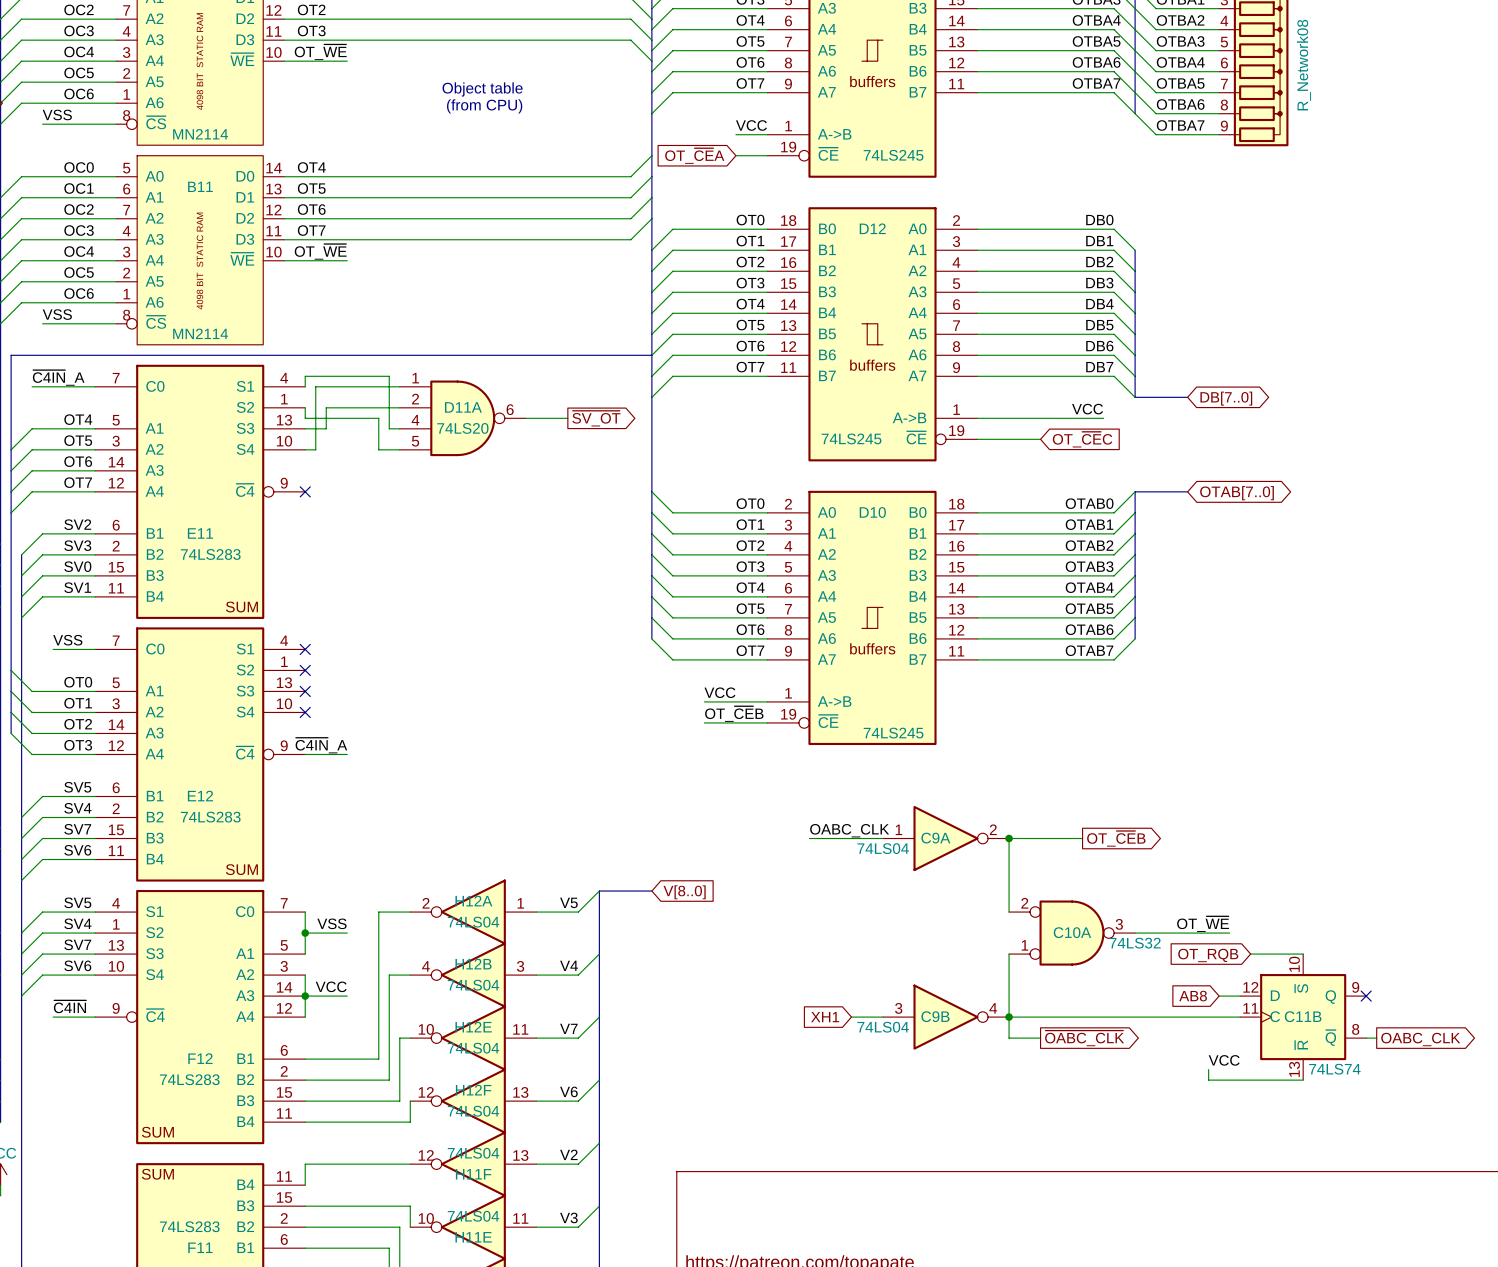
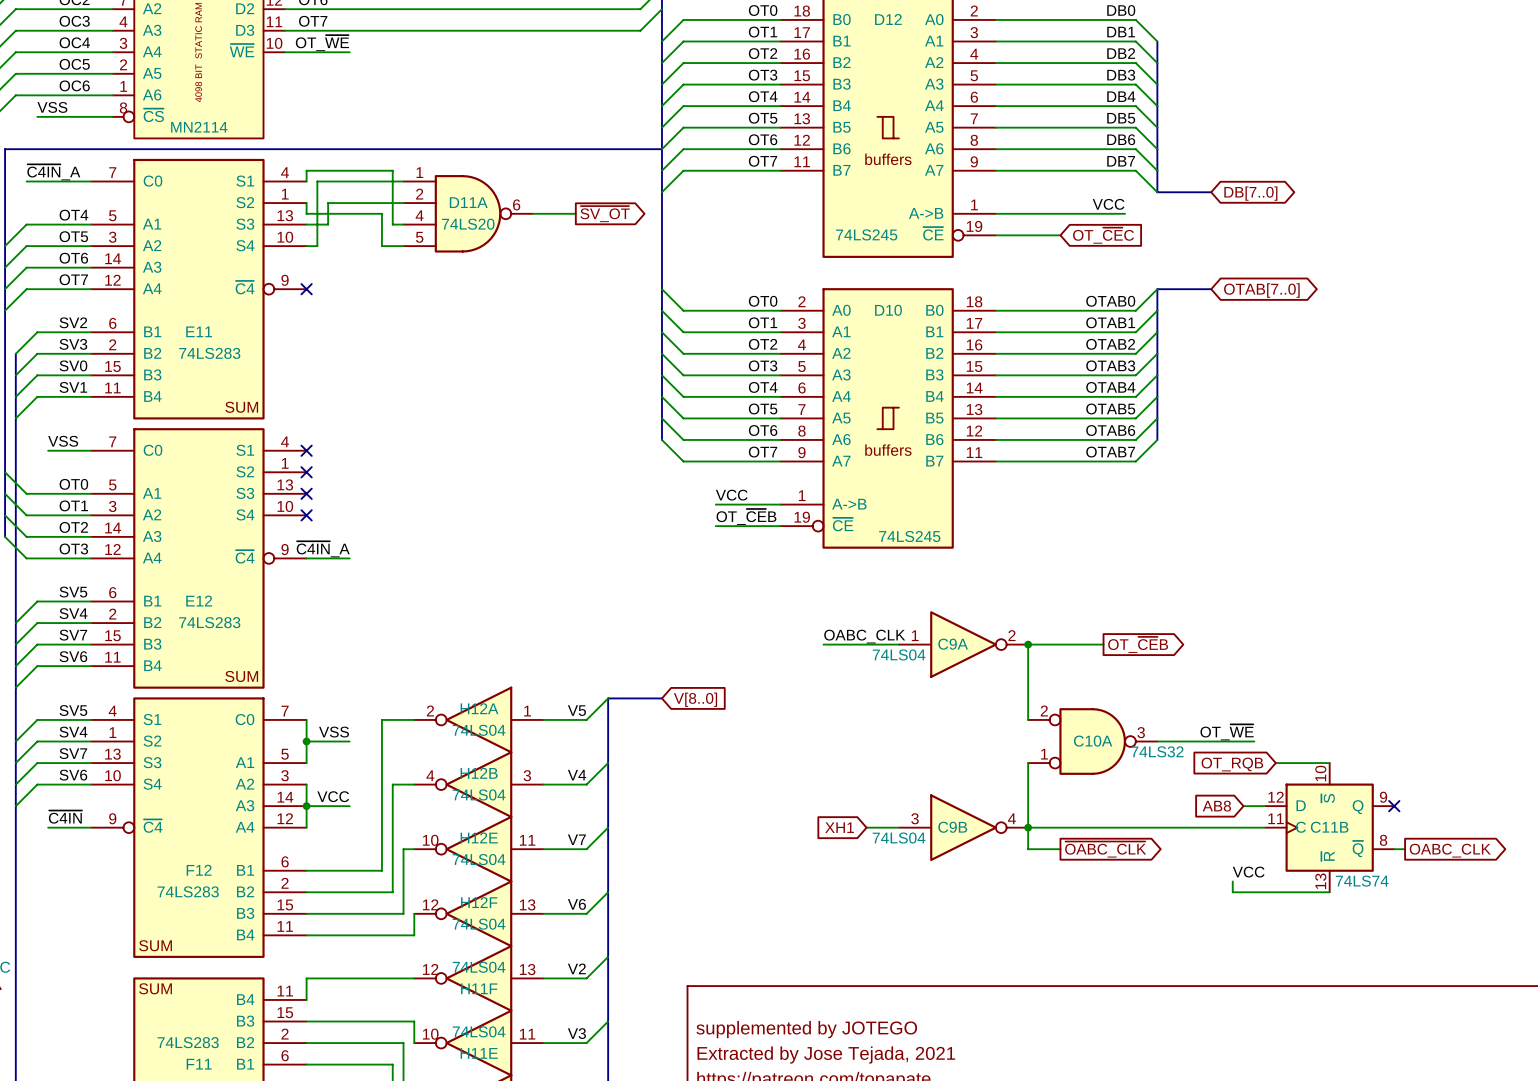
title block: none -> supplemented by JOTEGO (806, 1029)
title block: none -> Extracted by Jose Tejada, 2021 (826, 1055)

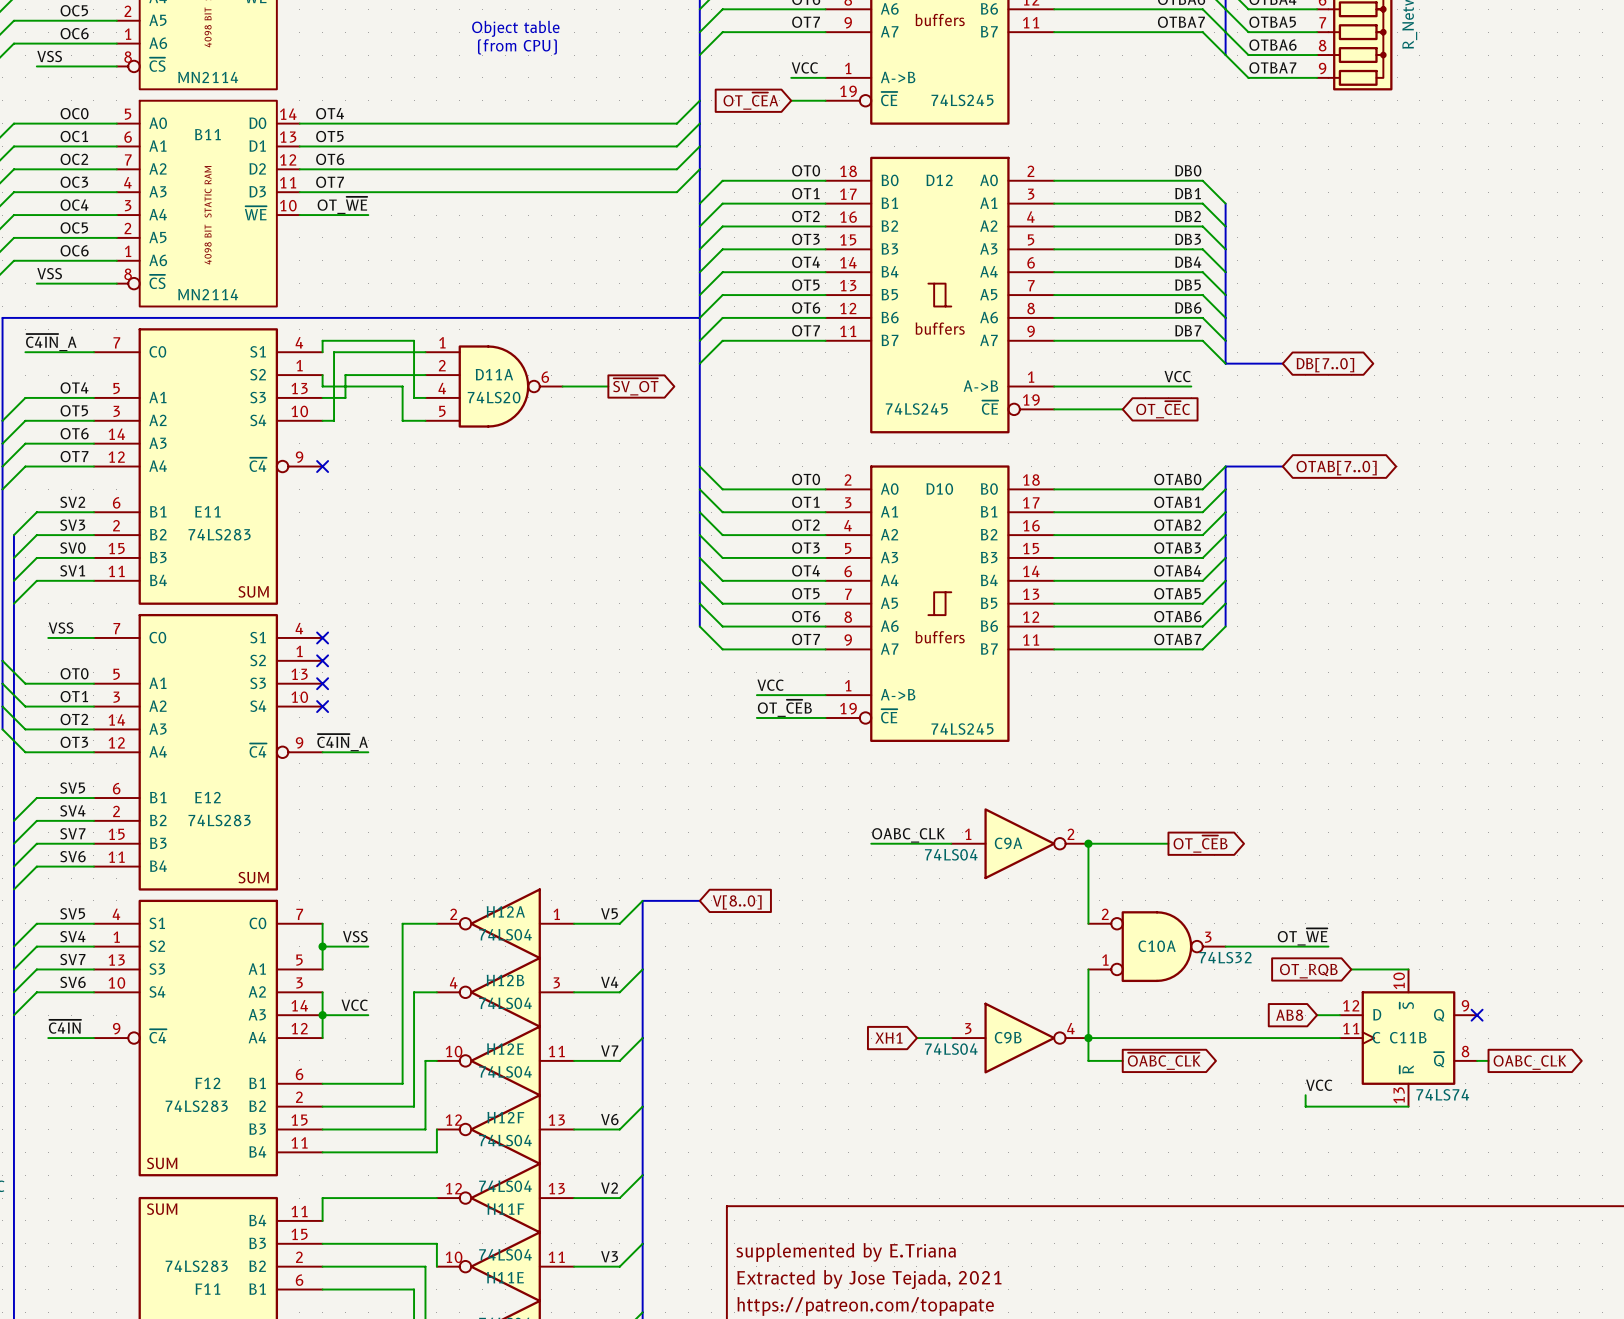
title block: supplemented by JOTEGO (806, 1029) -> supplemented by E.Triana (846, 1252)

